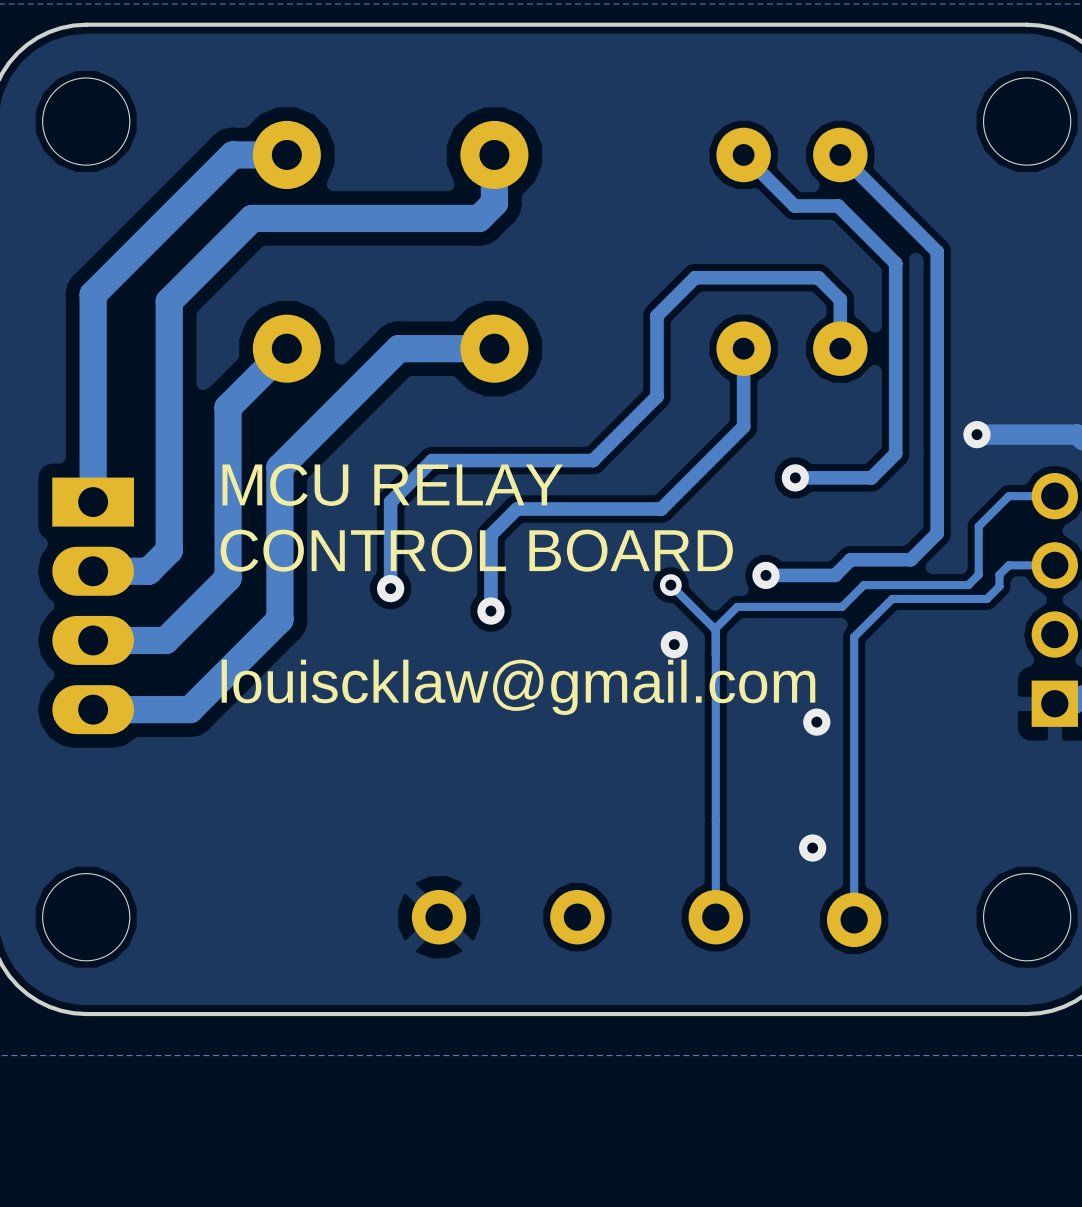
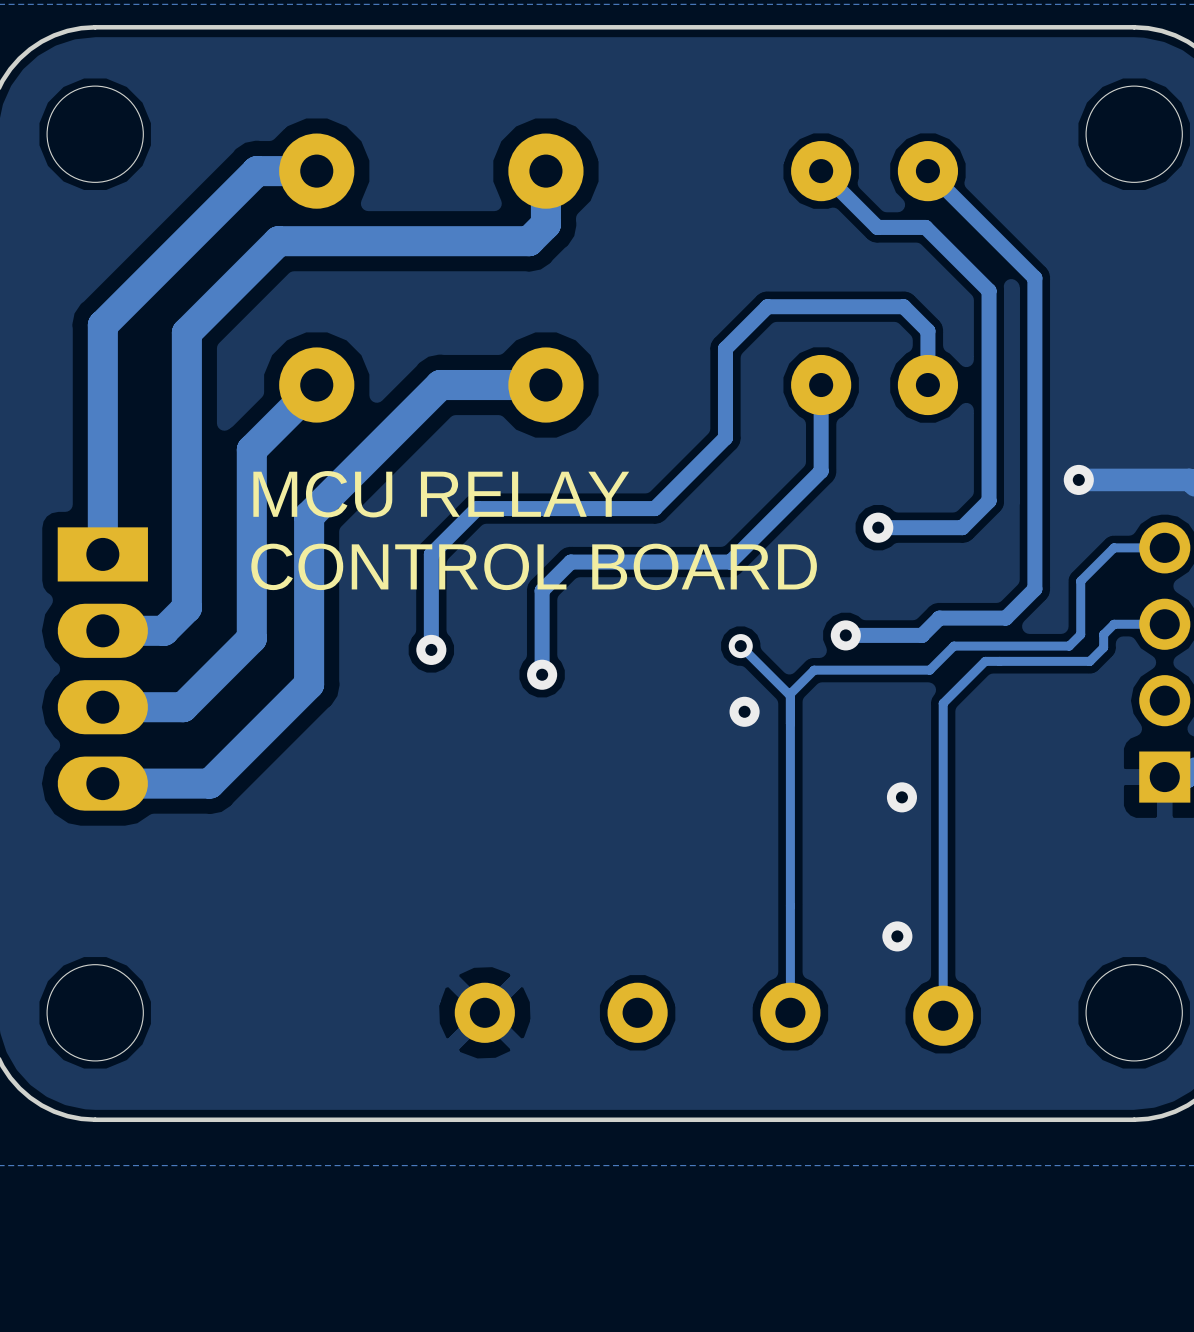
text position: MCU RELAY (392, 484) -> MCU RELAY (441, 494)
text position: CONTROL BOARD (476, 550) -> CONTROL BOARD (534, 566)
text: louiscklaw@gmail.com (518, 687) -> none

